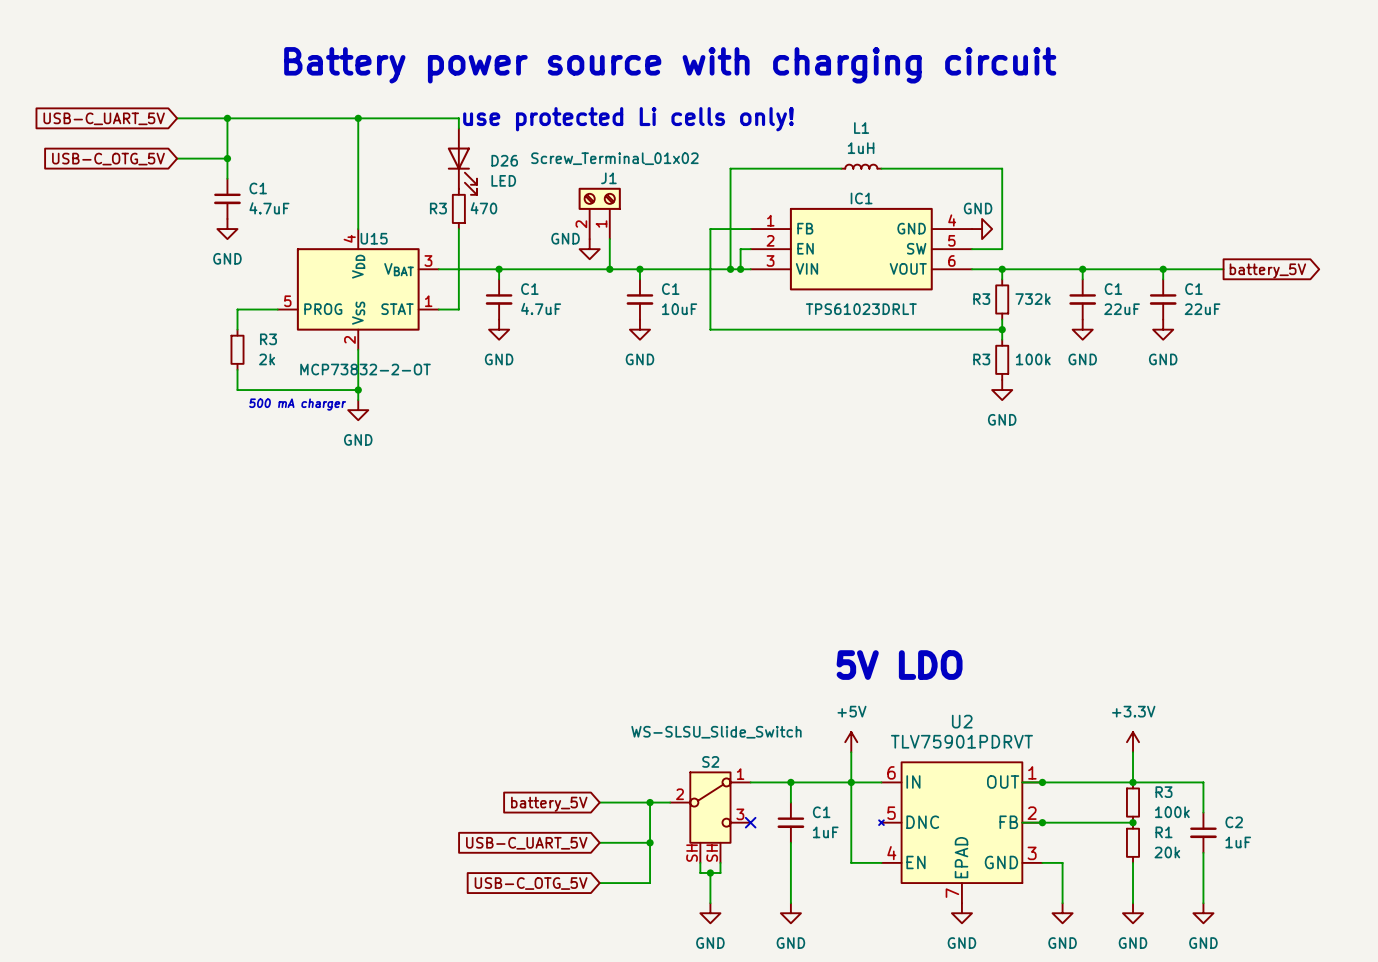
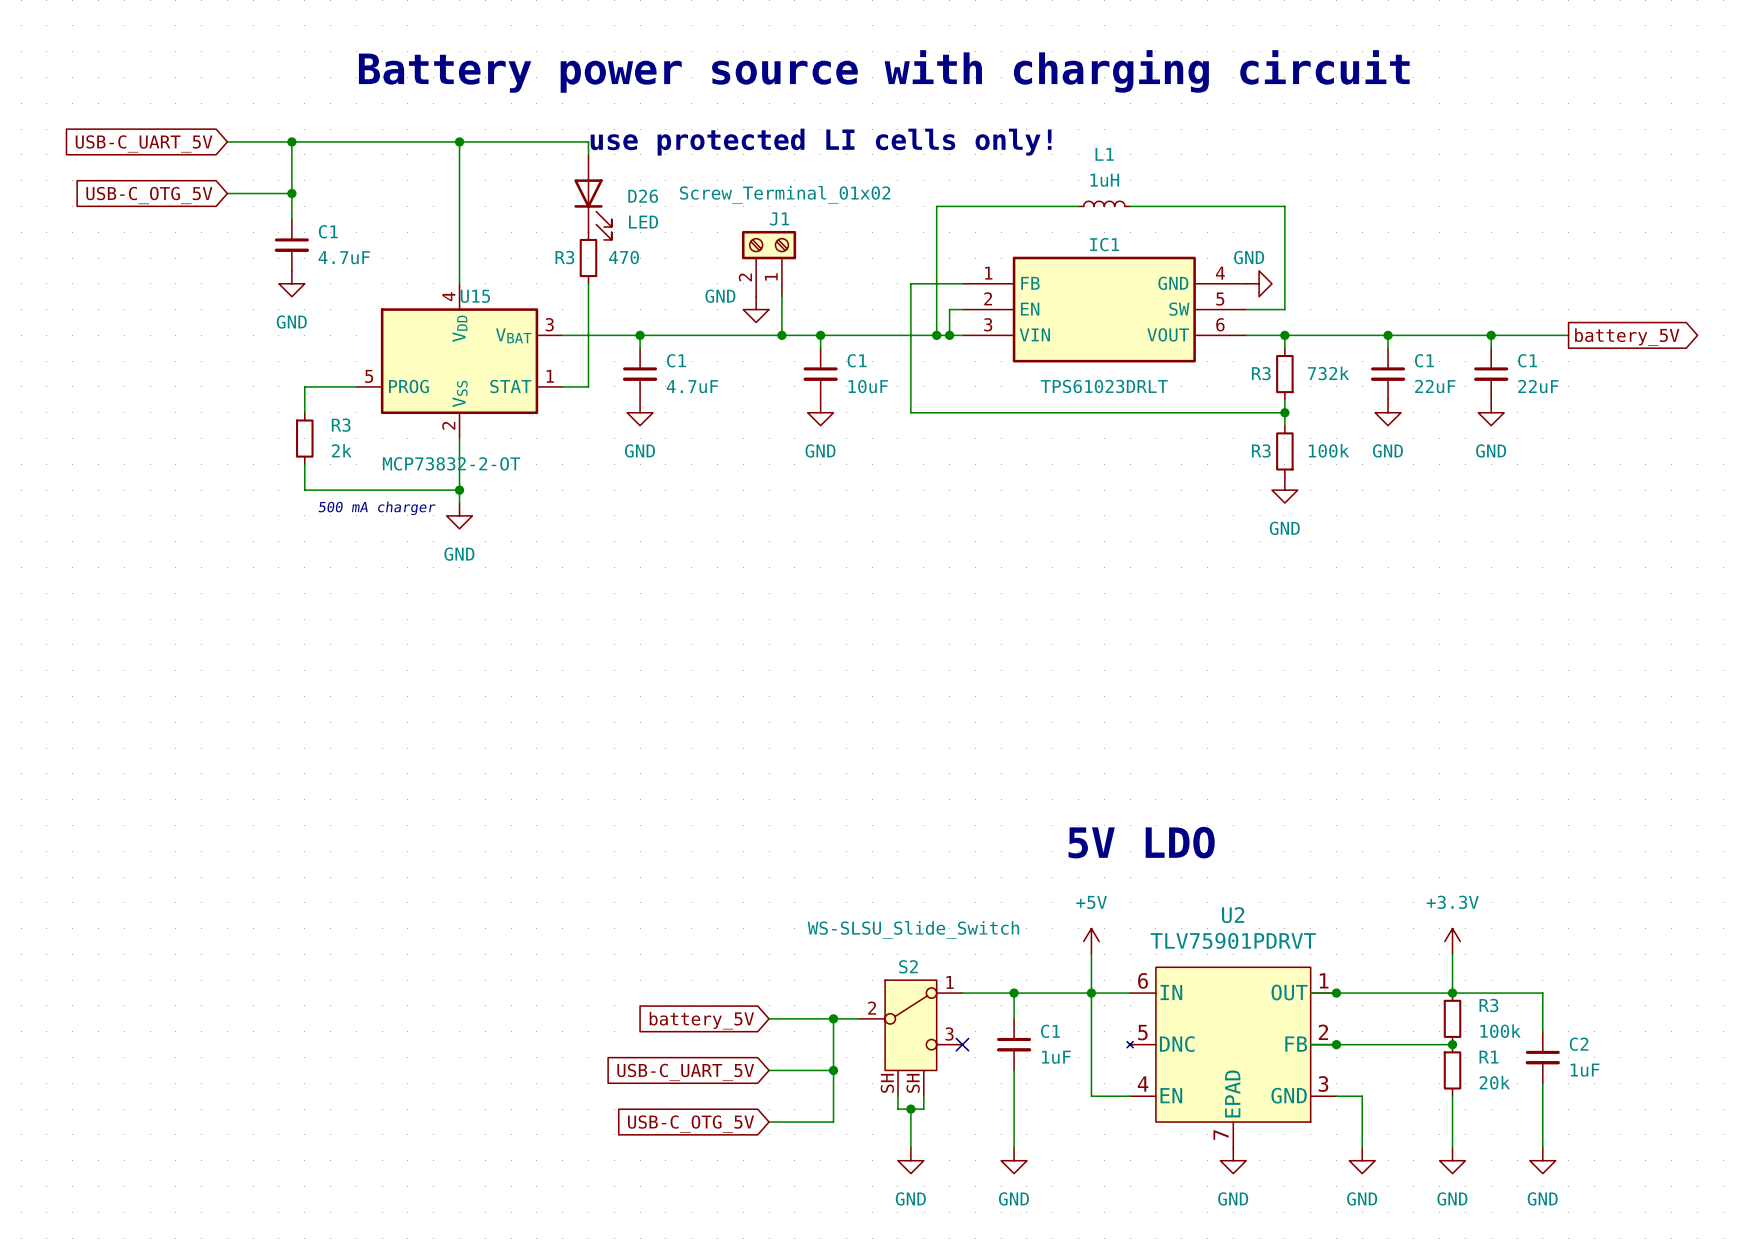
text: use protected Li cells only! (628, 119) -> use protected LI cells only! (821, 142)

